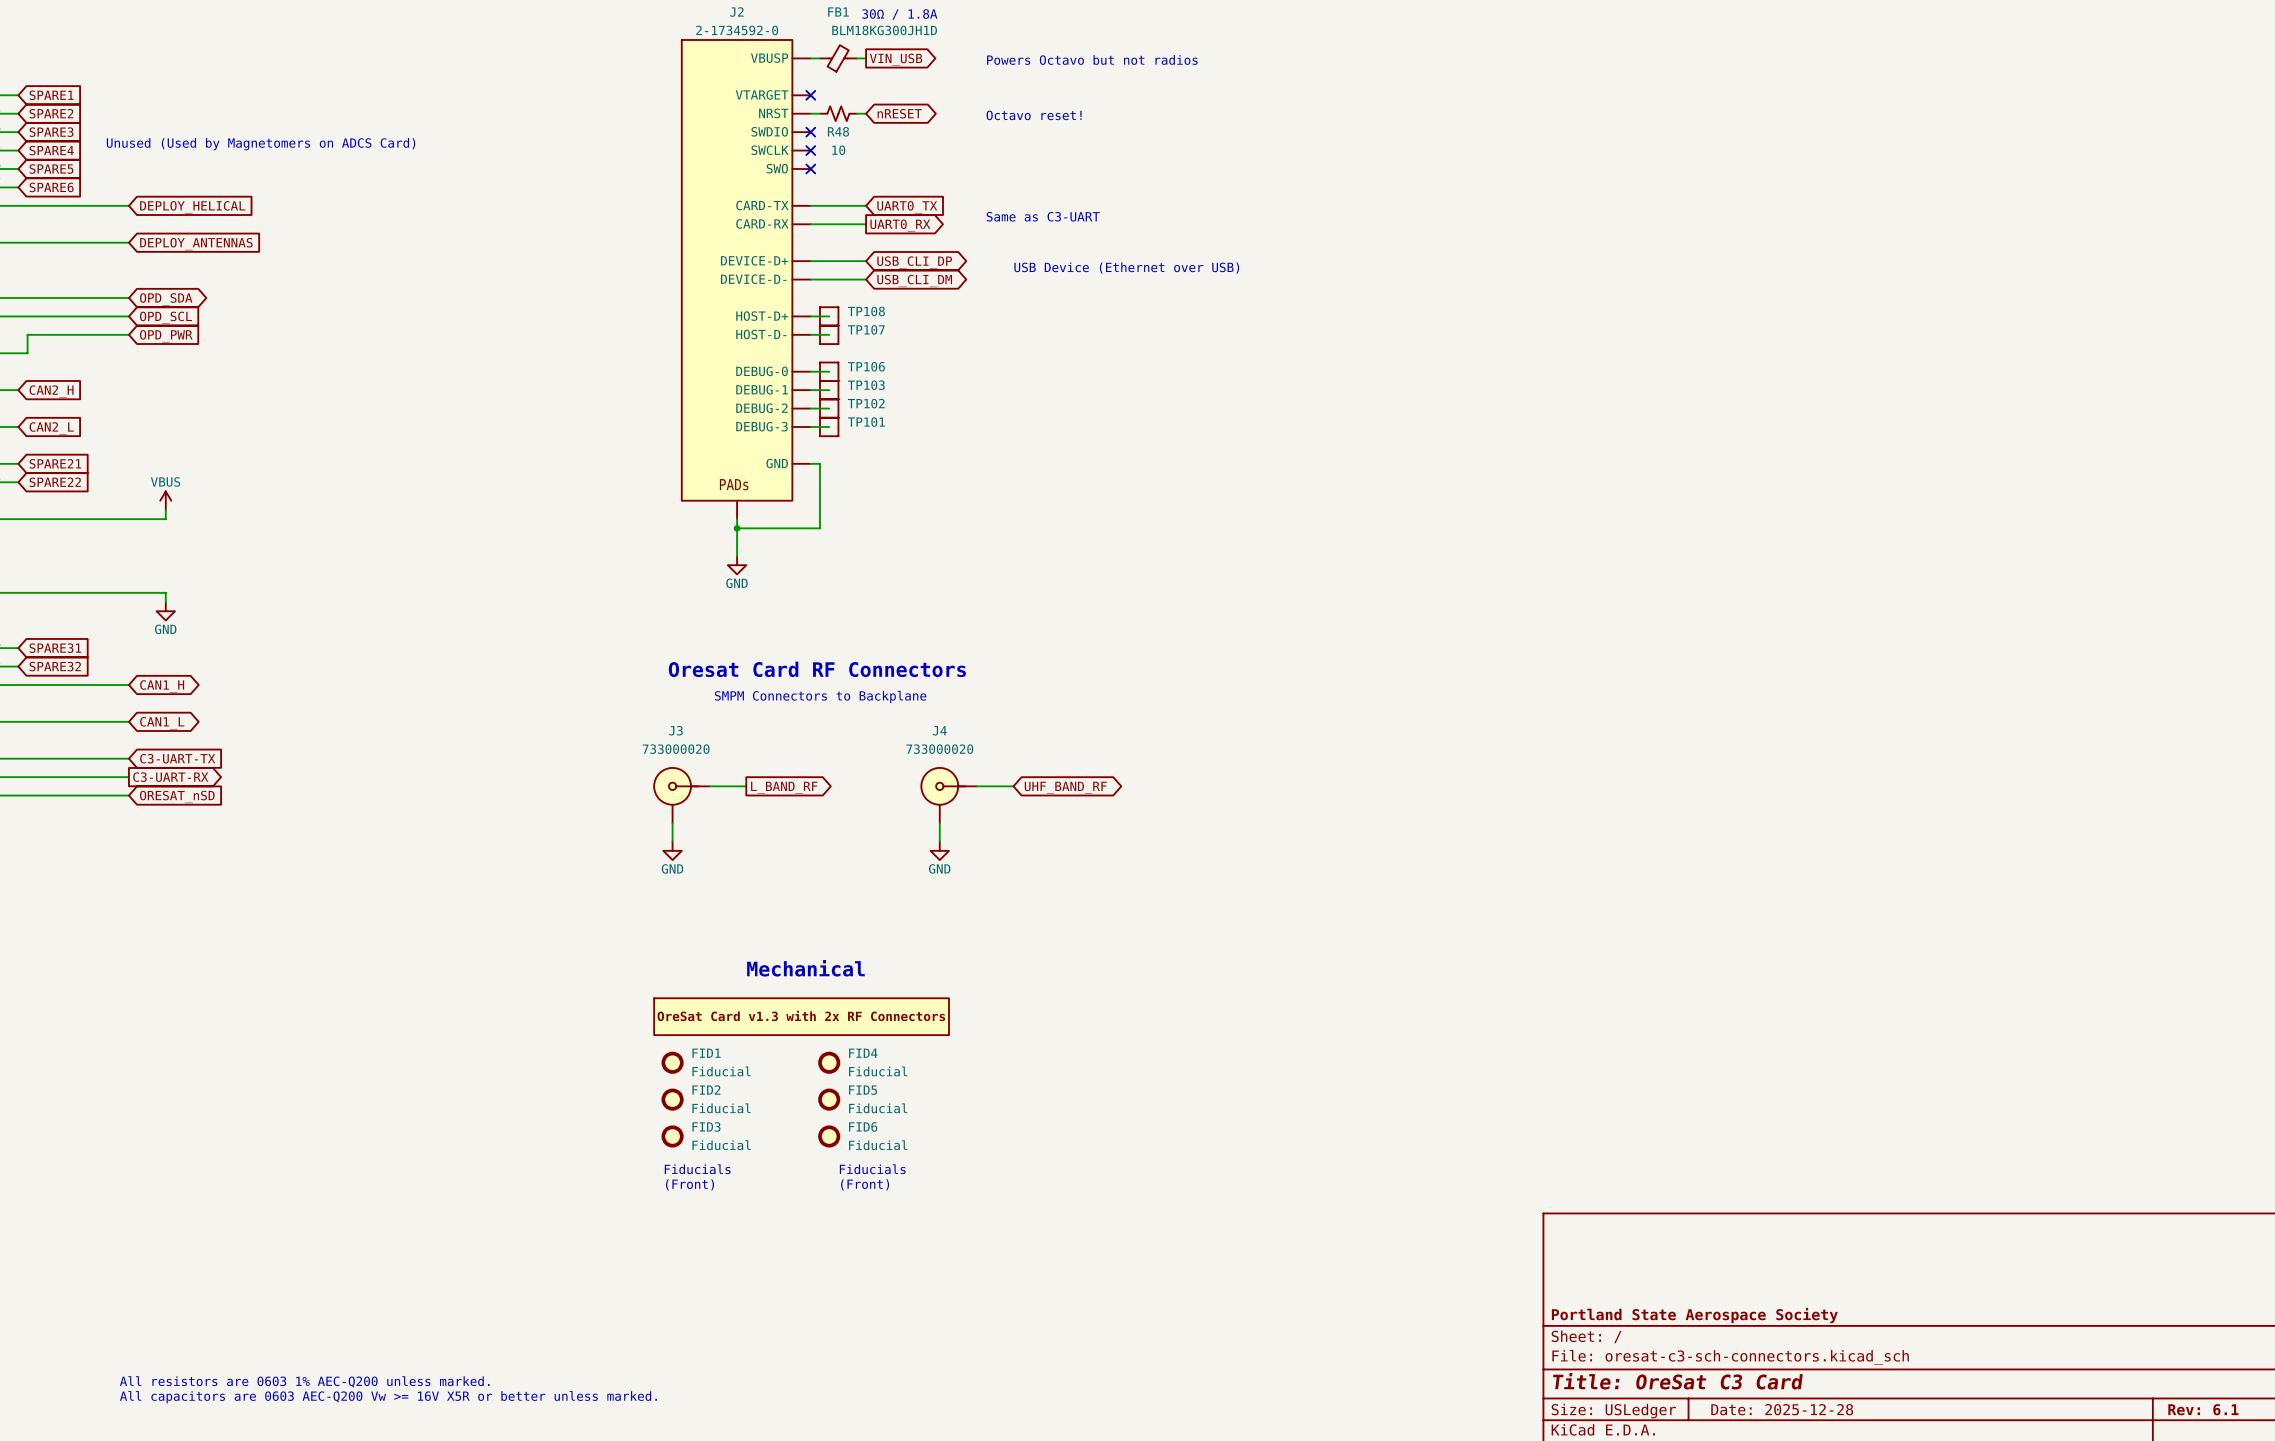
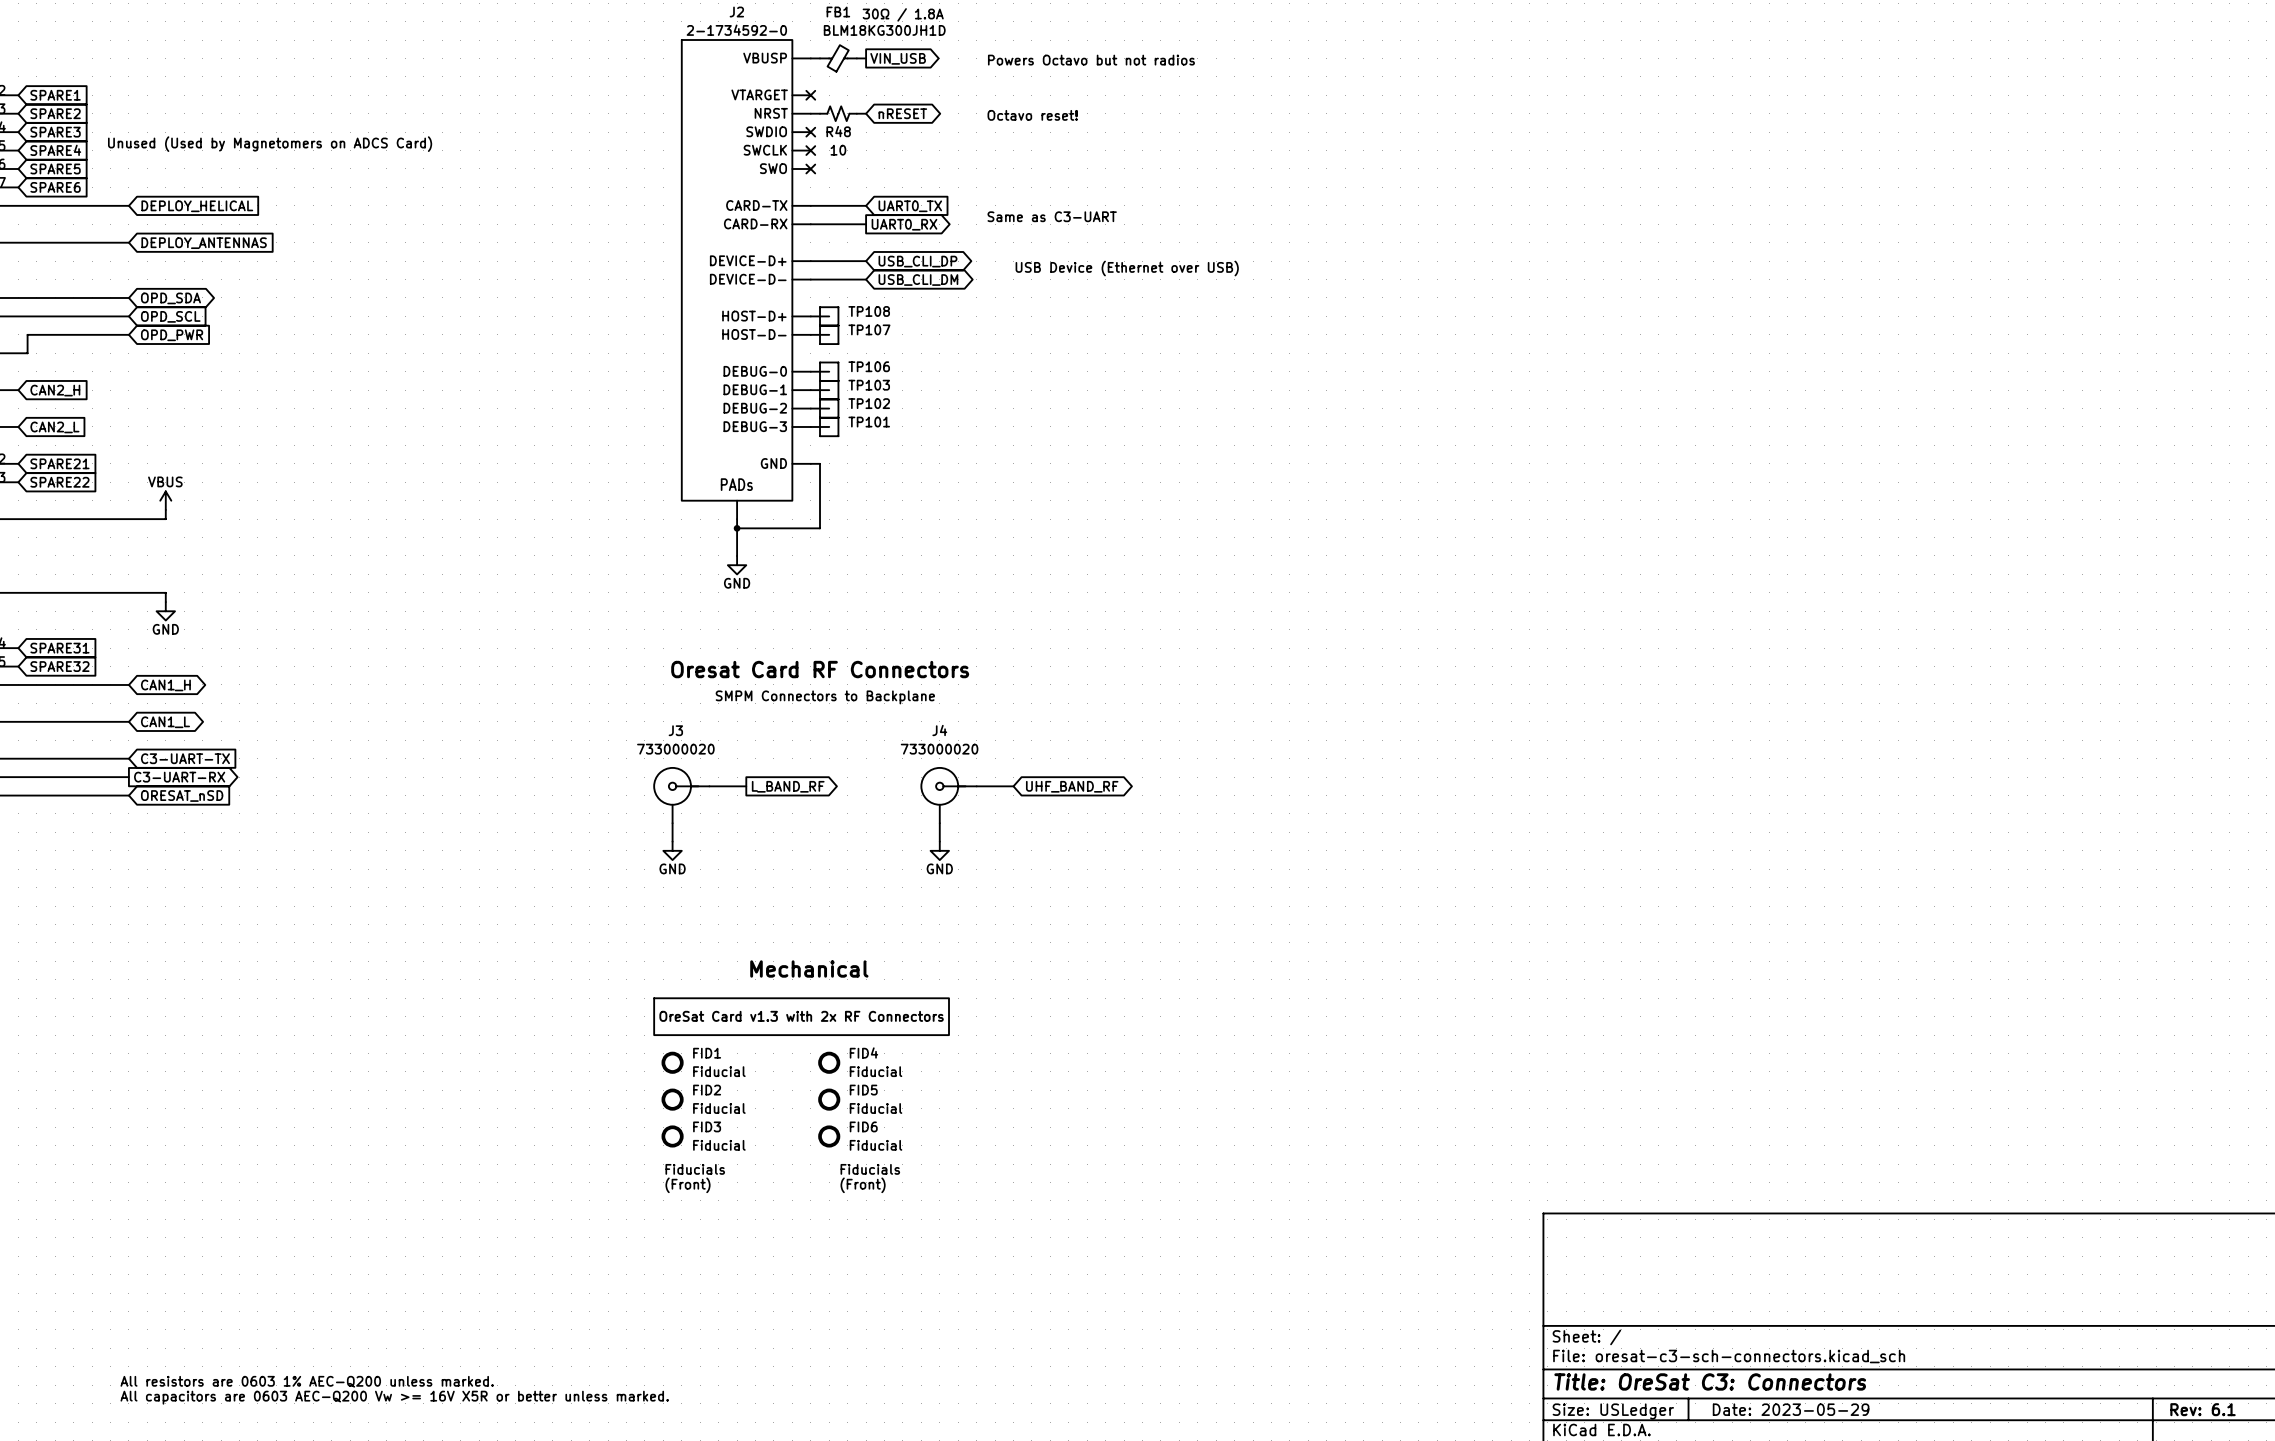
title block: Portland State Aerospace Society (1694, 1315) -> none
title block: Title: OreSat C3 Card (1677, 1381) -> Title: OreSat C3: Connectors (1710, 1381)
title block: Date: 2025-12-28 (1782, 1409) -> Date: 2023-05-29 (1791, 1409)

